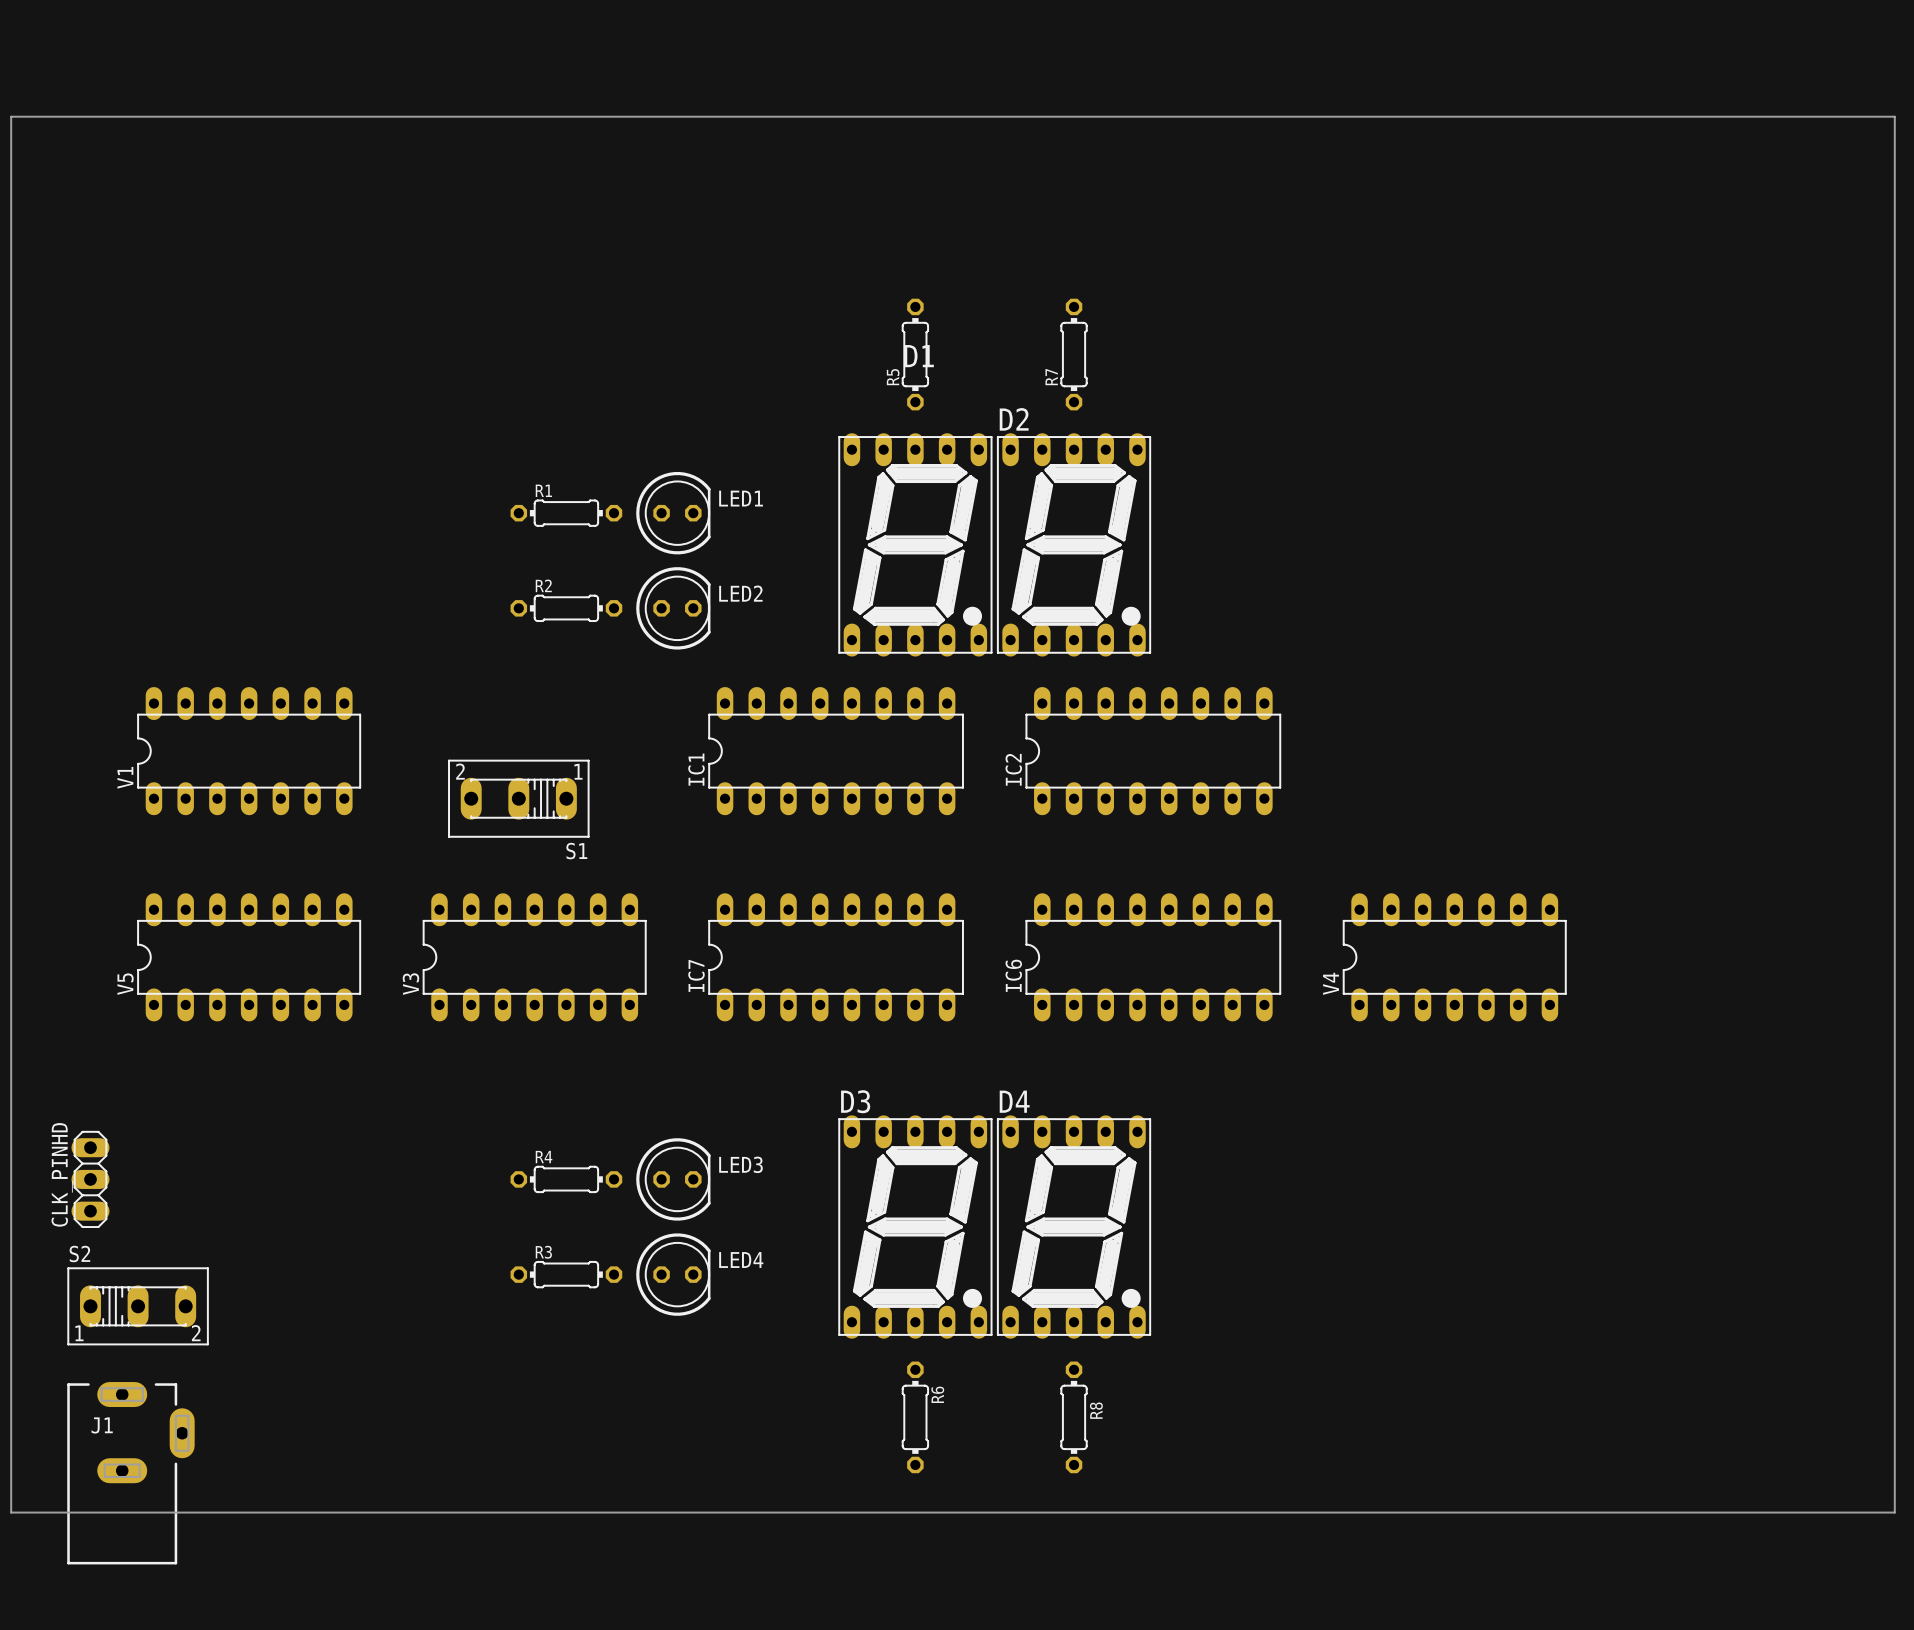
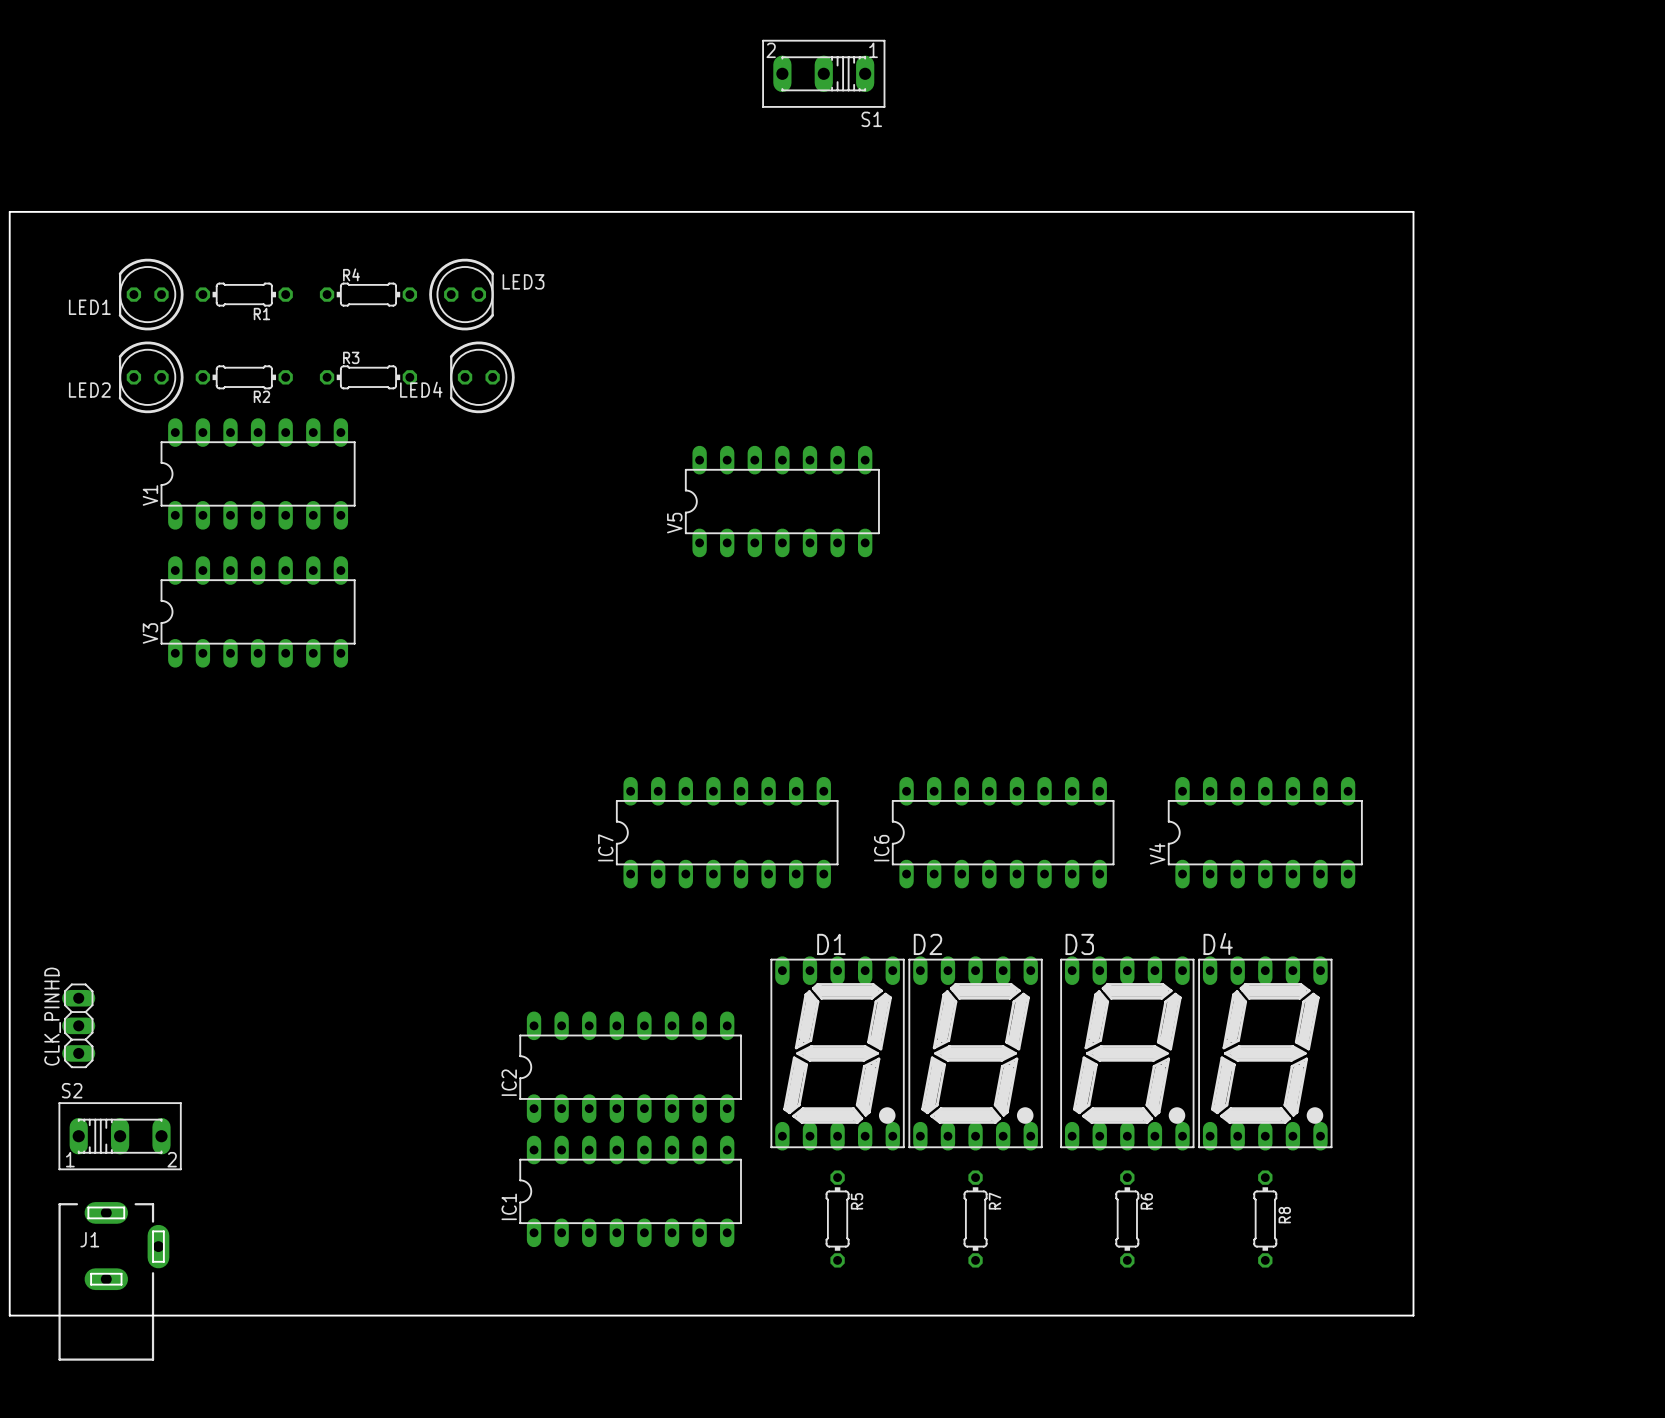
board edge: (11, 243) (11, 116) (1894, 116) (1894, 1512) (1625, 1512) -> (9, 211) (1413, 211) (1413, 1315)
R5 position: (915, 354) -> (837, 1219)
R7 position: (1074, 354) -> (975, 1219)
D1 name position: D1 (919, 356) -> D1 (831, 944)
R5 name position: R5 (893, 377) -> R5 (857, 1201)
R7 name position: R7 (1051, 377) -> R7 (995, 1201)
R1 name position: R1 (543, 490) -> R1 (261, 314)
R1 position: (566, 513) -> (244, 294)
LED1 rotation: 0° (673, 513) -> 180° (151, 294)
LED1 position: (673, 513) -> (151, 294)
D1 position: (915, 544) -> (837, 1053)
D2 position: (1074, 544) -> (975, 1053)
R2 name position: R2 (543, 585) -> R2 (261, 396)
R2 position: (566, 608) -> (244, 377)
LED2 rotation: 0° (673, 608) -> 180° (151, 377)
LED2 position: (673, 608) -> (151, 377)
V1 position: (249, 751) -> (258, 473)
IC1 position: (836, 751) -> (630, 1191)
IC2 position: (1153, 751) -> (630, 1067)
S1 position: (518, 798) -> (823, 73)
V5 position: (249, 957) -> (782, 501)
V3 position: (534, 957) -> (258, 611)
R4 position: (566, 1179) -> (368, 294)
LED3 position: (673, 1179) -> (461, 294)
D3 position: (915, 1227) -> (1127, 1053)
D4 position: (1074, 1227) -> (1265, 1053)
R3 position: (566, 1274) -> (368, 377)
LED4 rotation: 0° (673, 1274) -> 180° (482, 377)
LED4 position: (673, 1274) -> (482, 377)
R6 position: (915, 1417) -> (1127, 1219)
R8 position: (1074, 1417) -> (1265, 1219)

